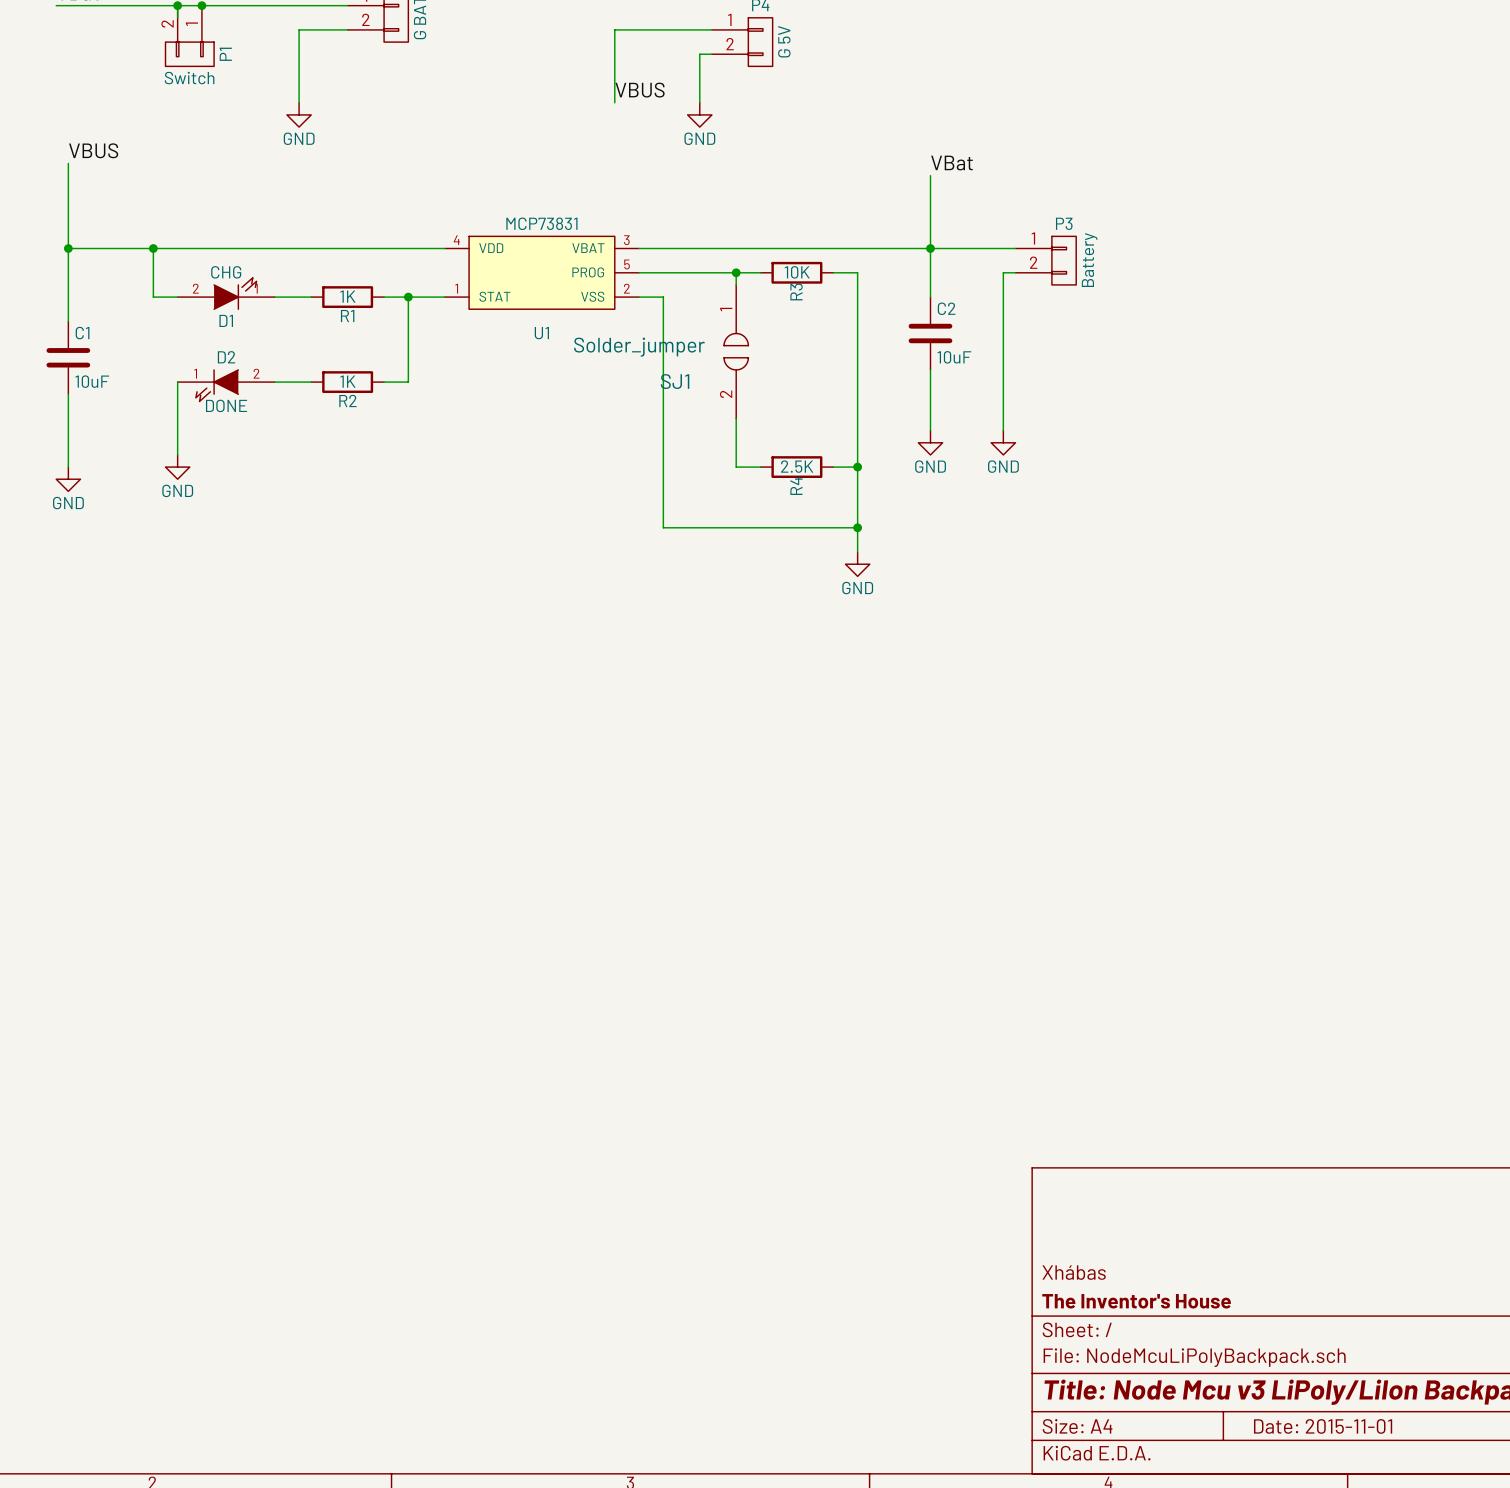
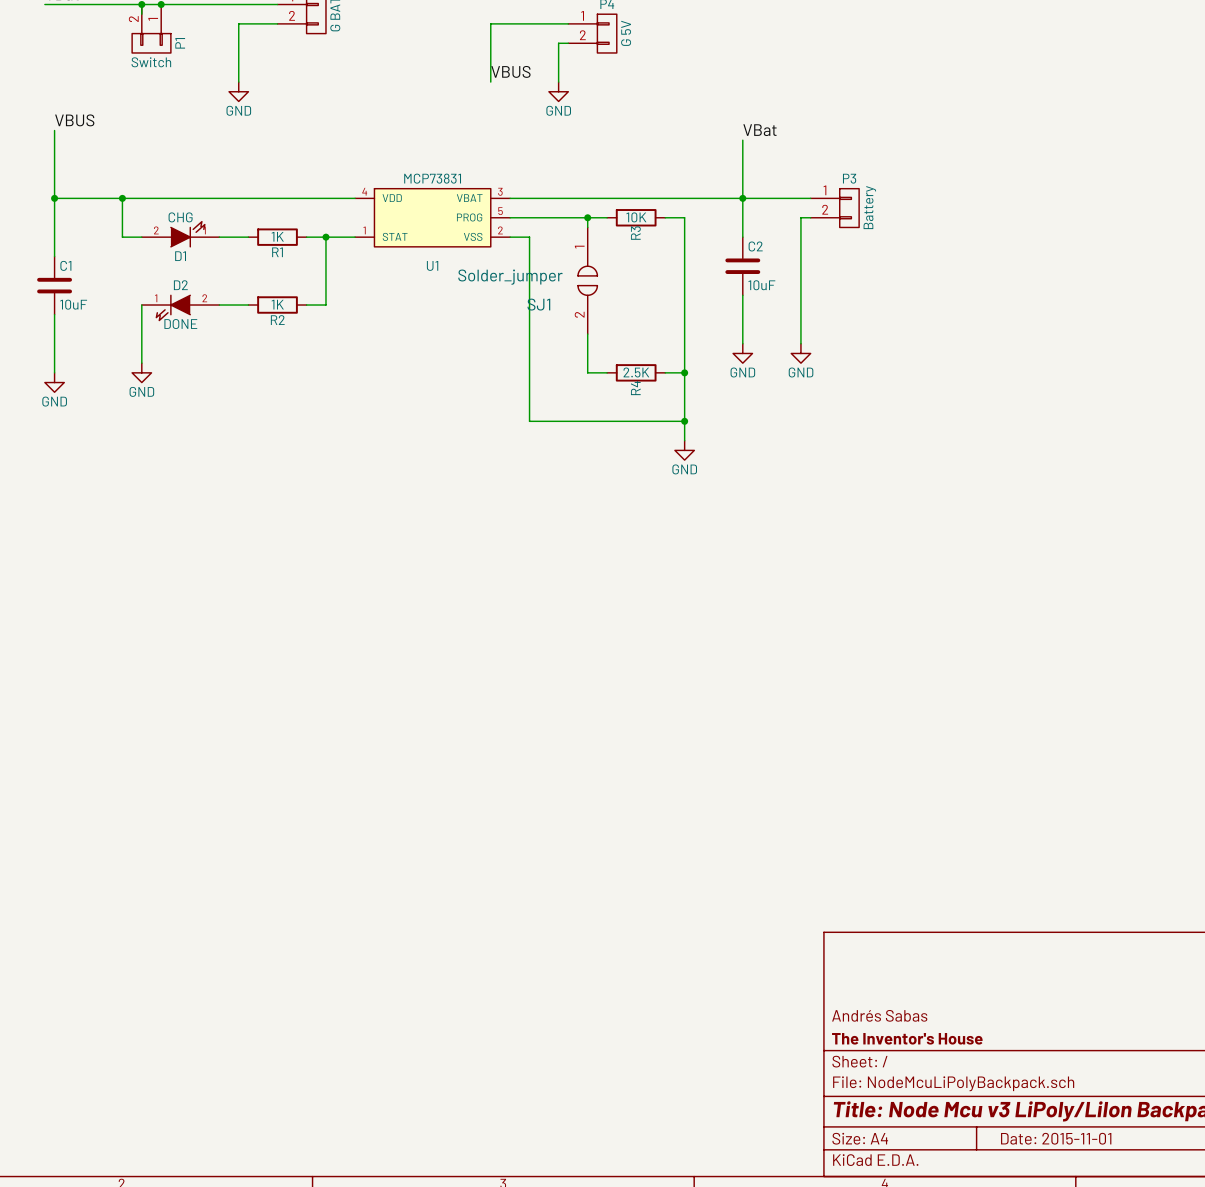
title block: Xhábas (1074, 1272) -> Andrés Sabas (879, 1015)

